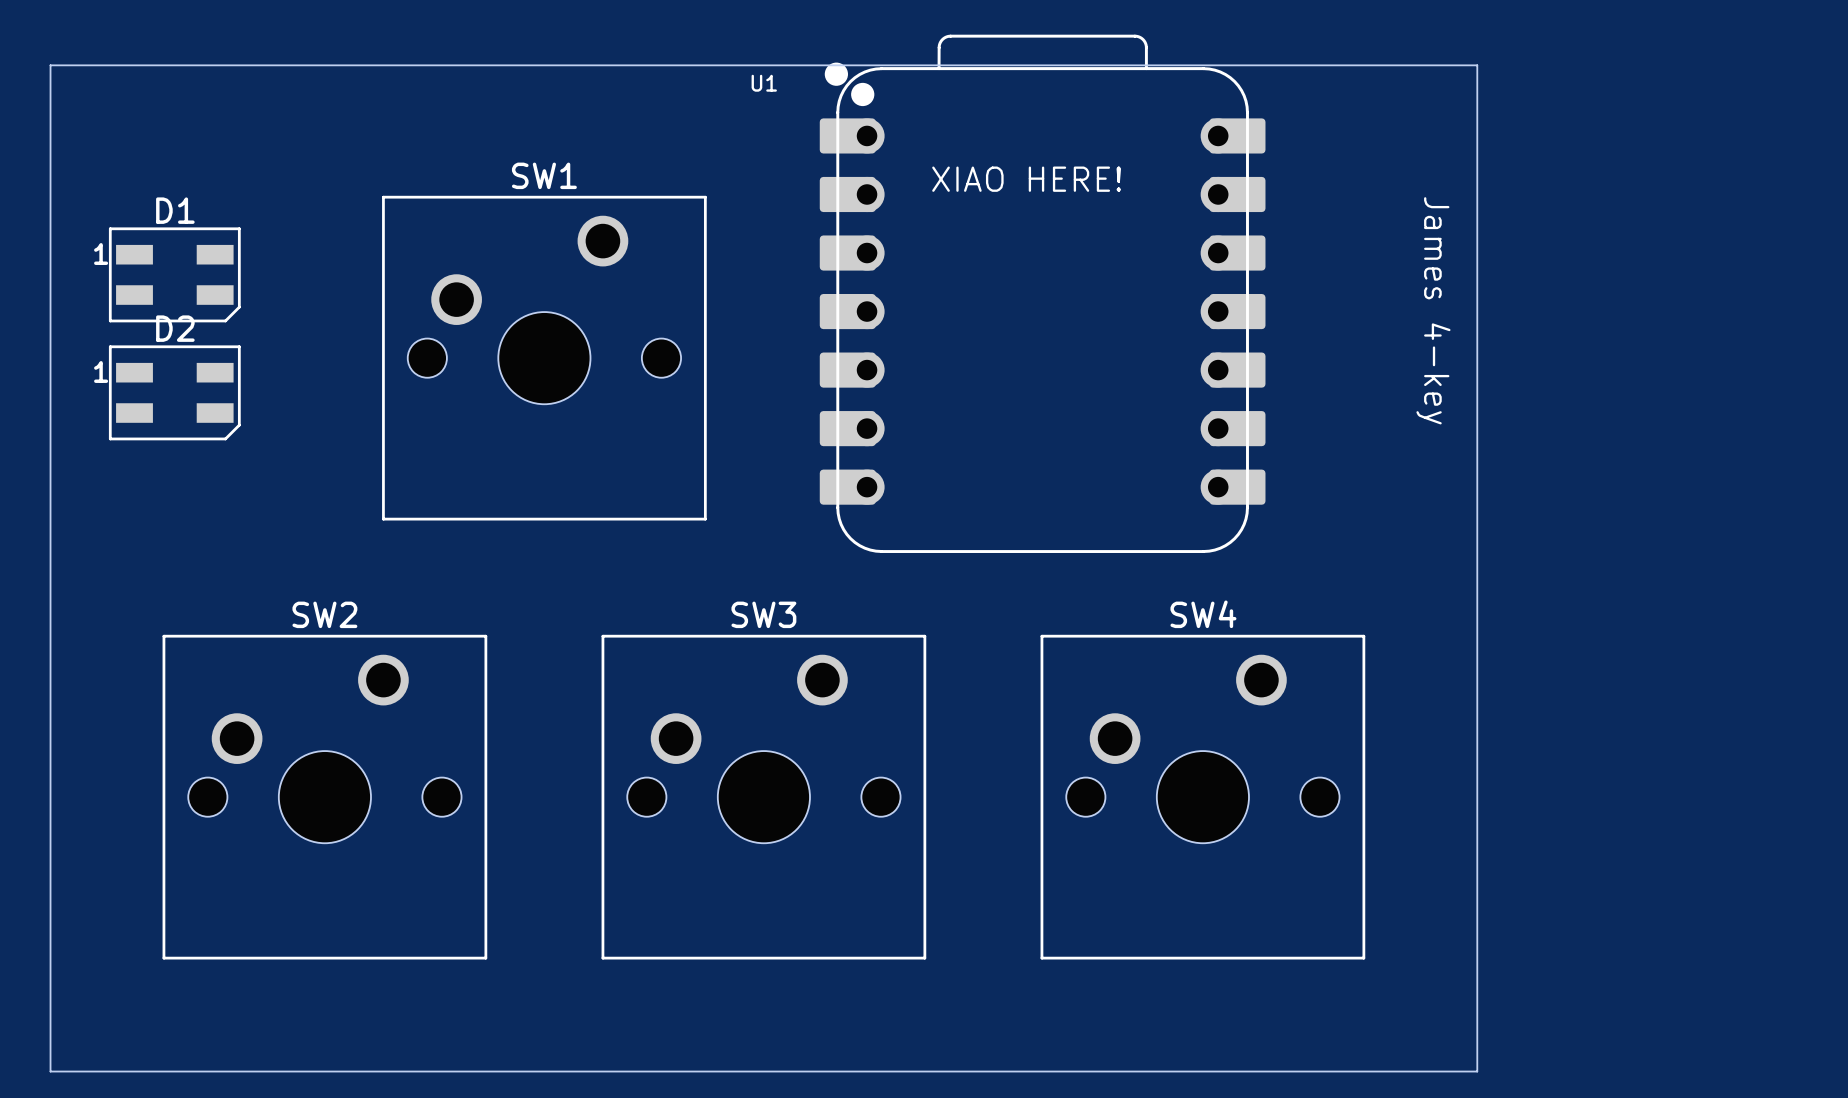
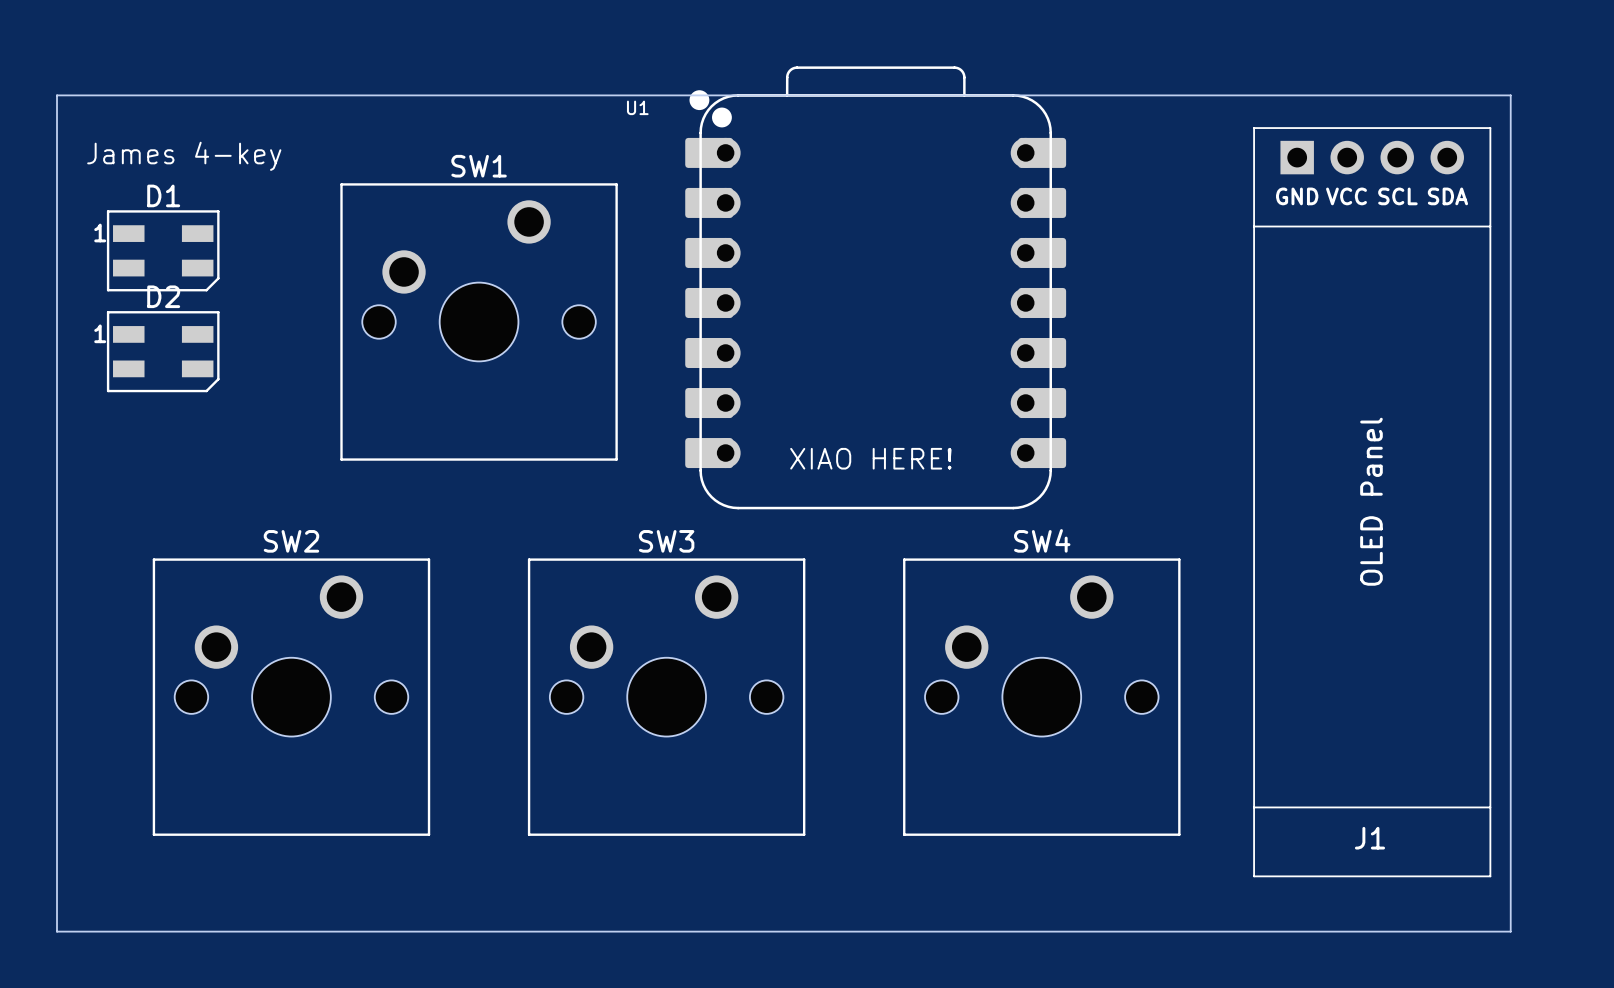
board edge: (50, 92) (50, 65) (1477, 65) (1477, 1071) -> (57, 95) (1510, 95) (1510, 931) (1276, 931)
text: none -> James 4-key (184, 156)
text position: XIAO HERE! (1026, 179) -> XIAO HERE! (870, 458)
U1 position: (1042, 293) -> (875, 287)
text: James 4-key (1433, 310) -> none
J1: none -> (1372, 502)

